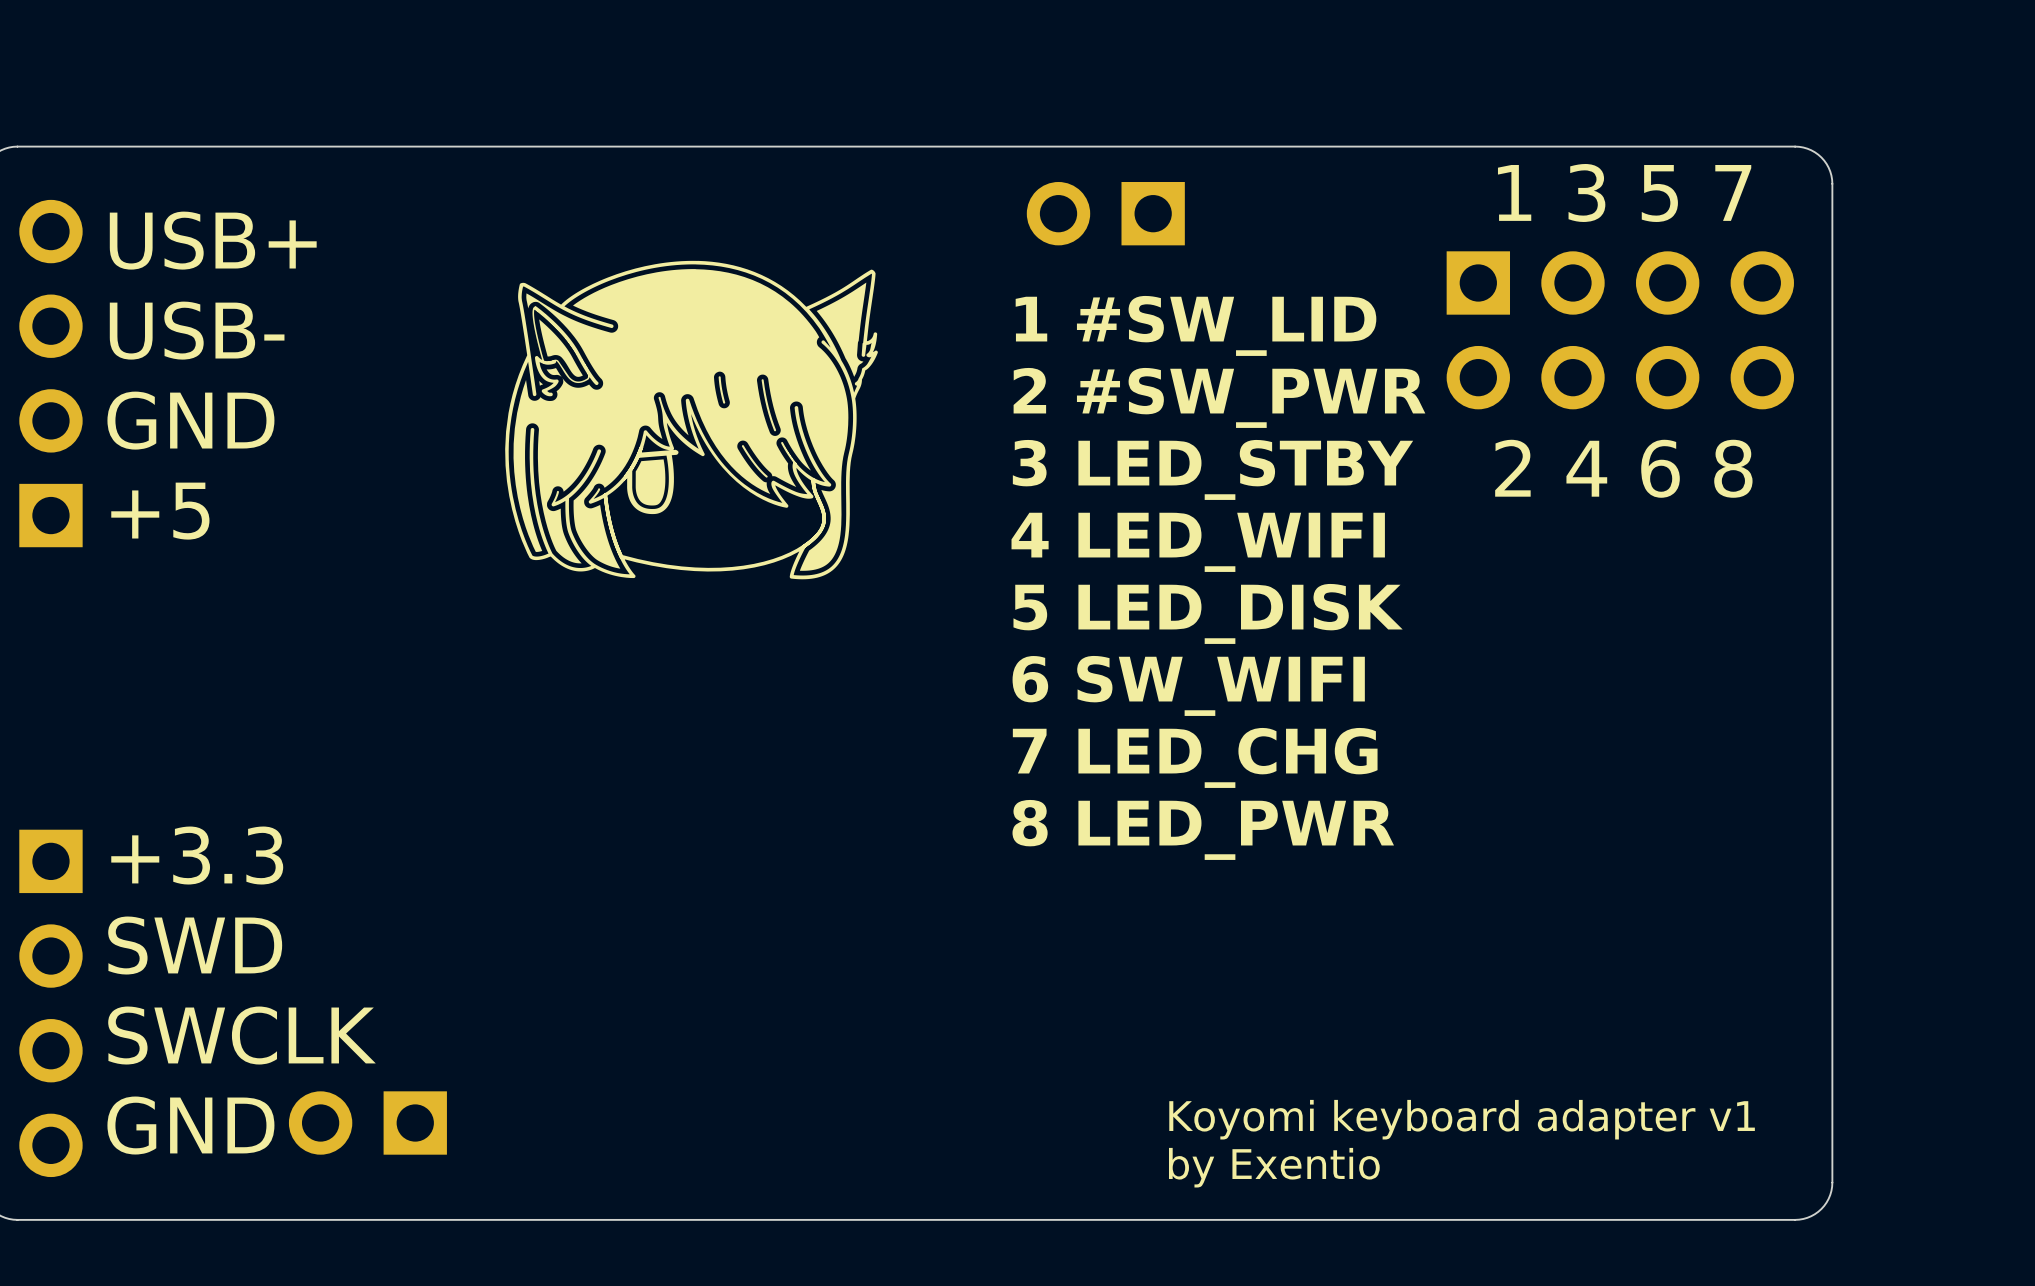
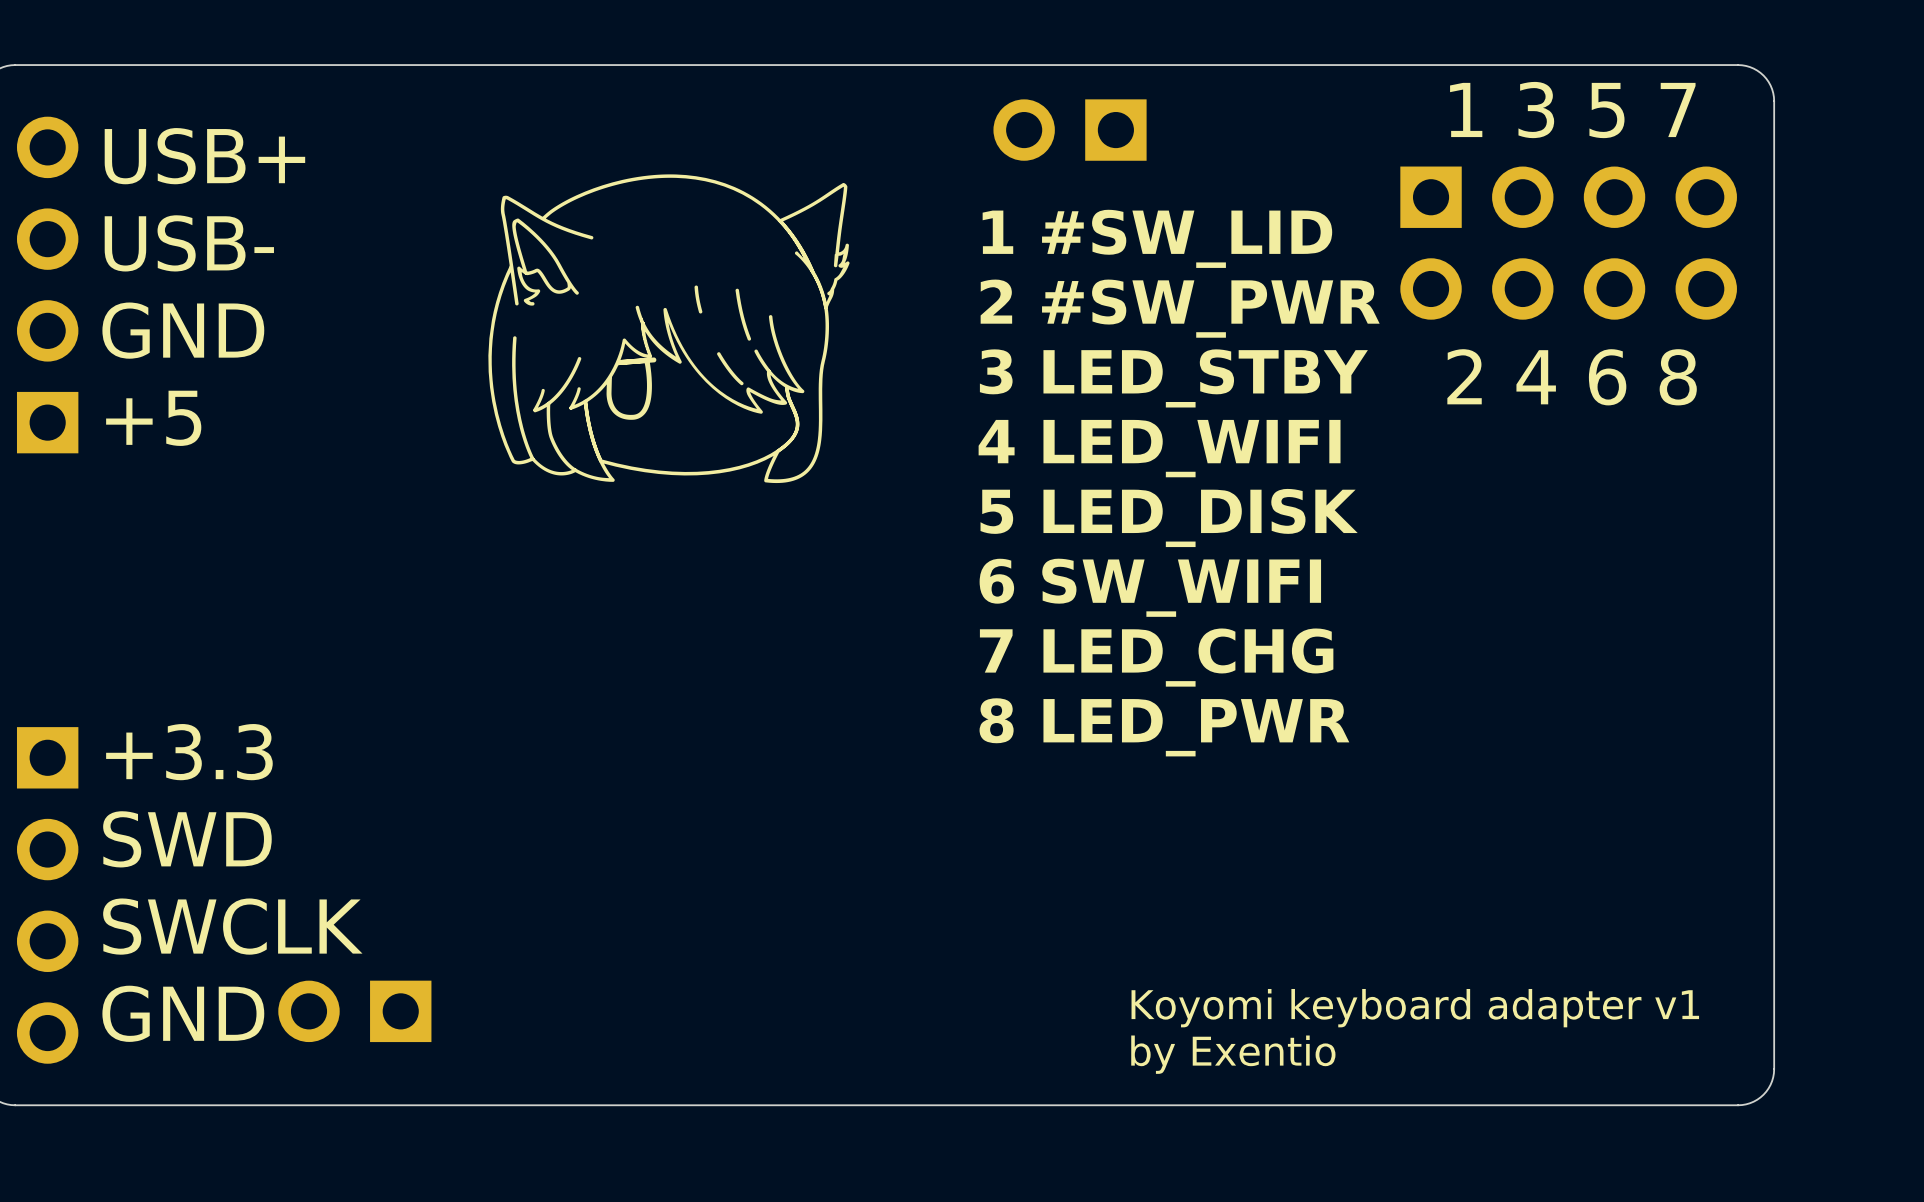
drawing shape: [505, 260, 878, 580] -> [488, 174, 850, 484]

